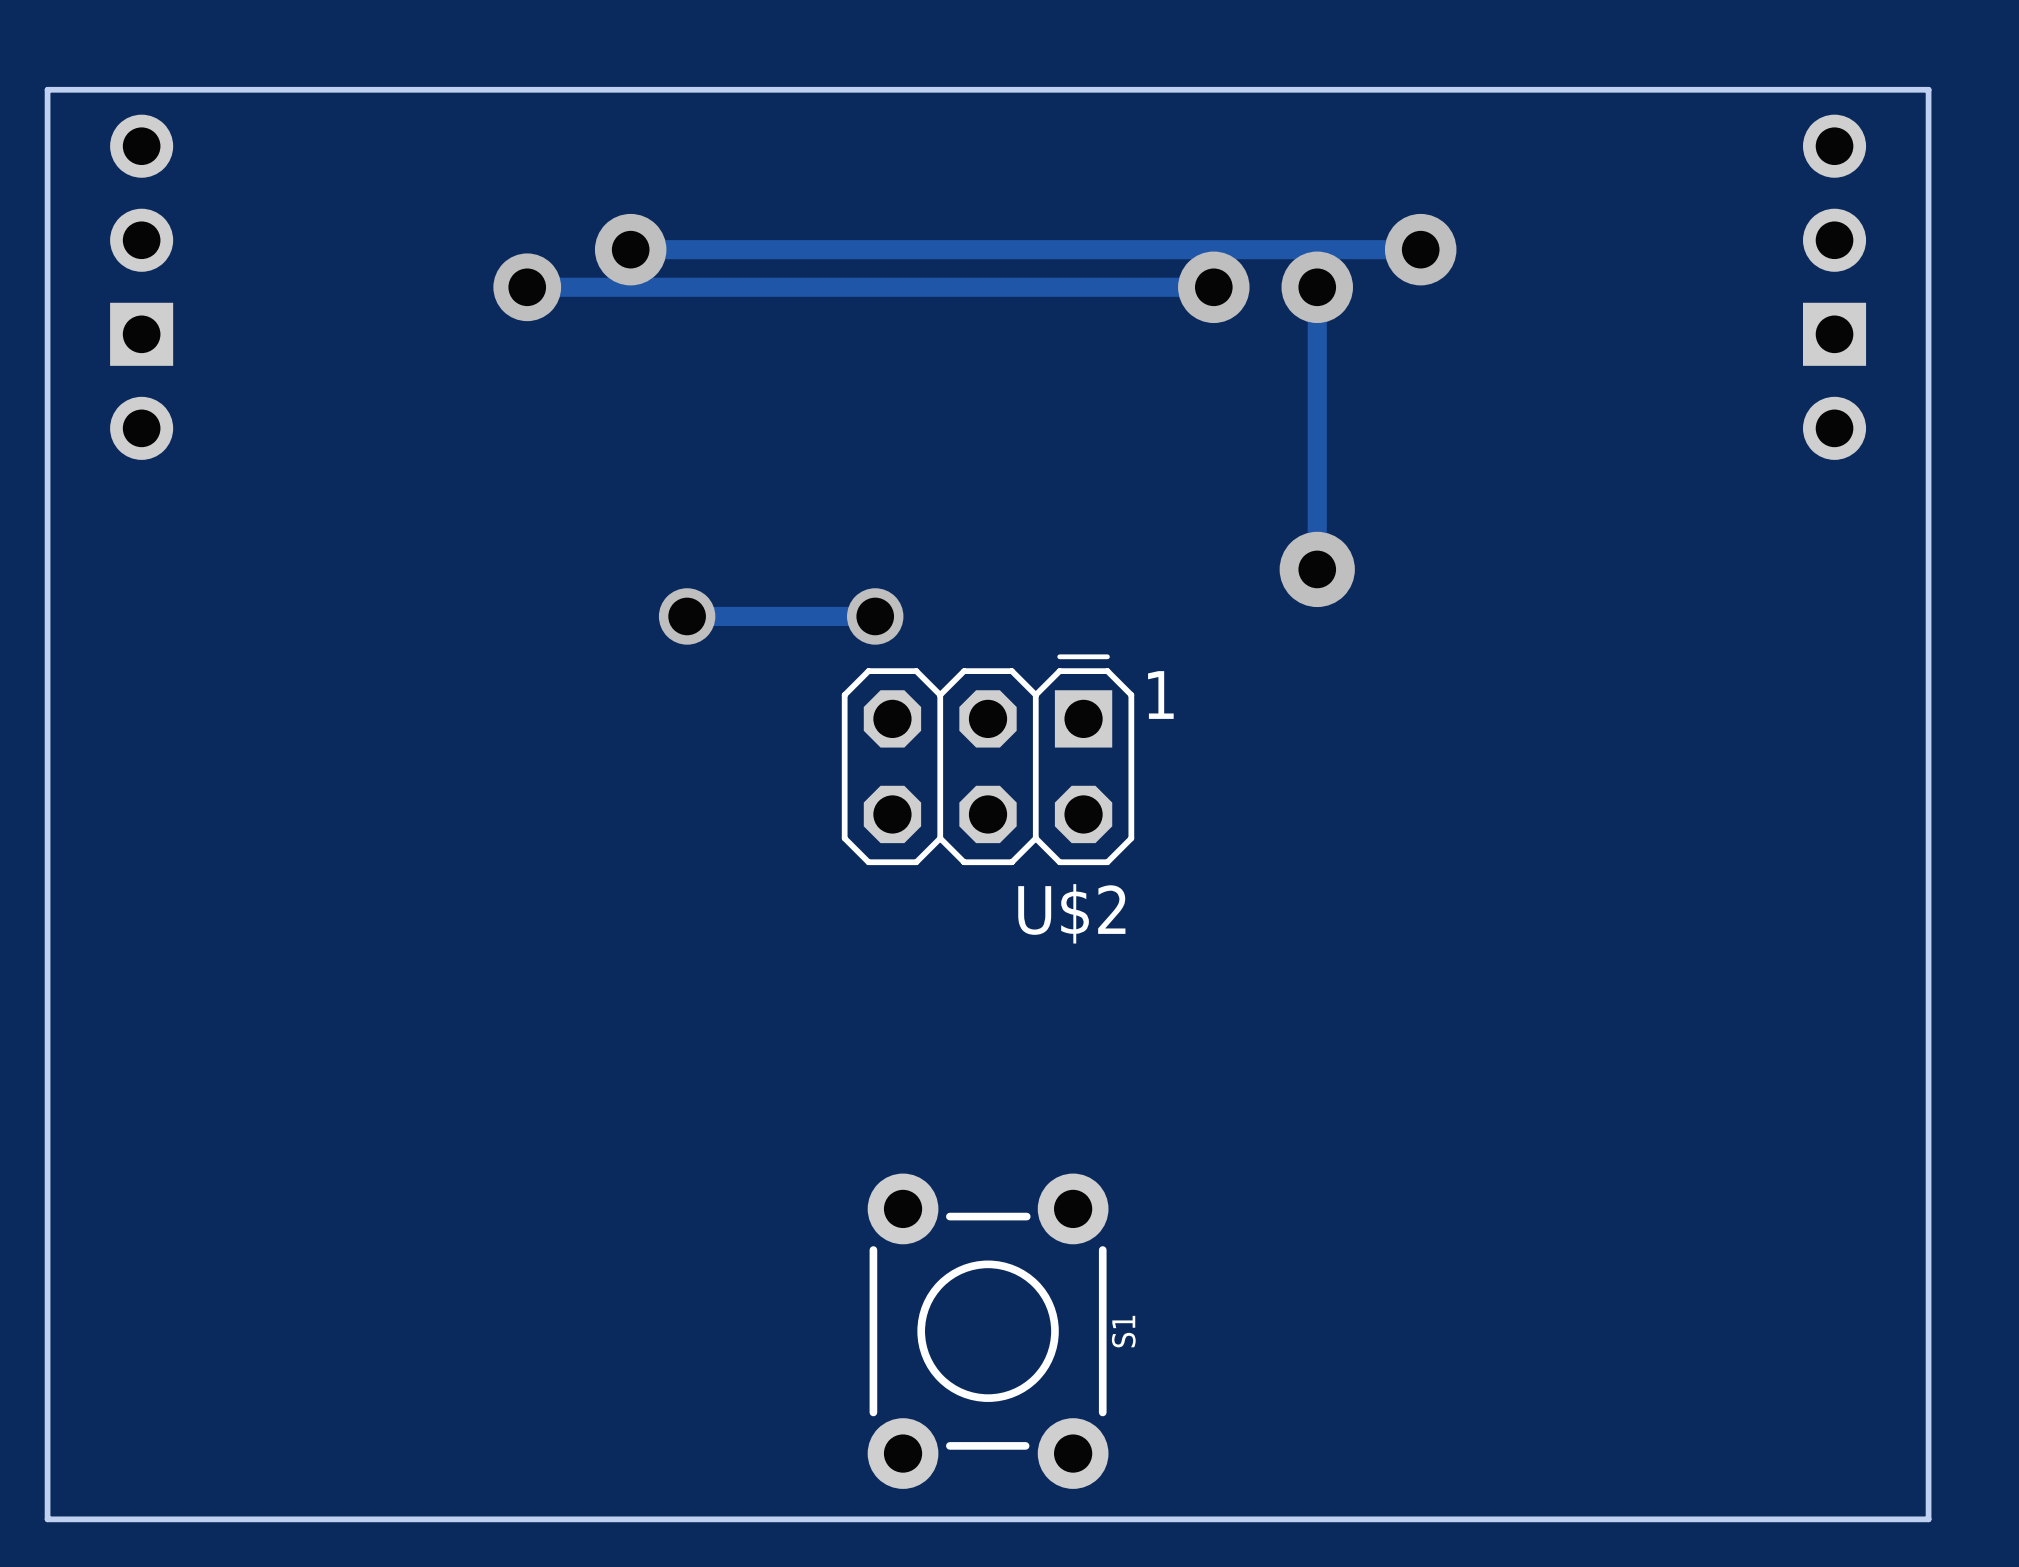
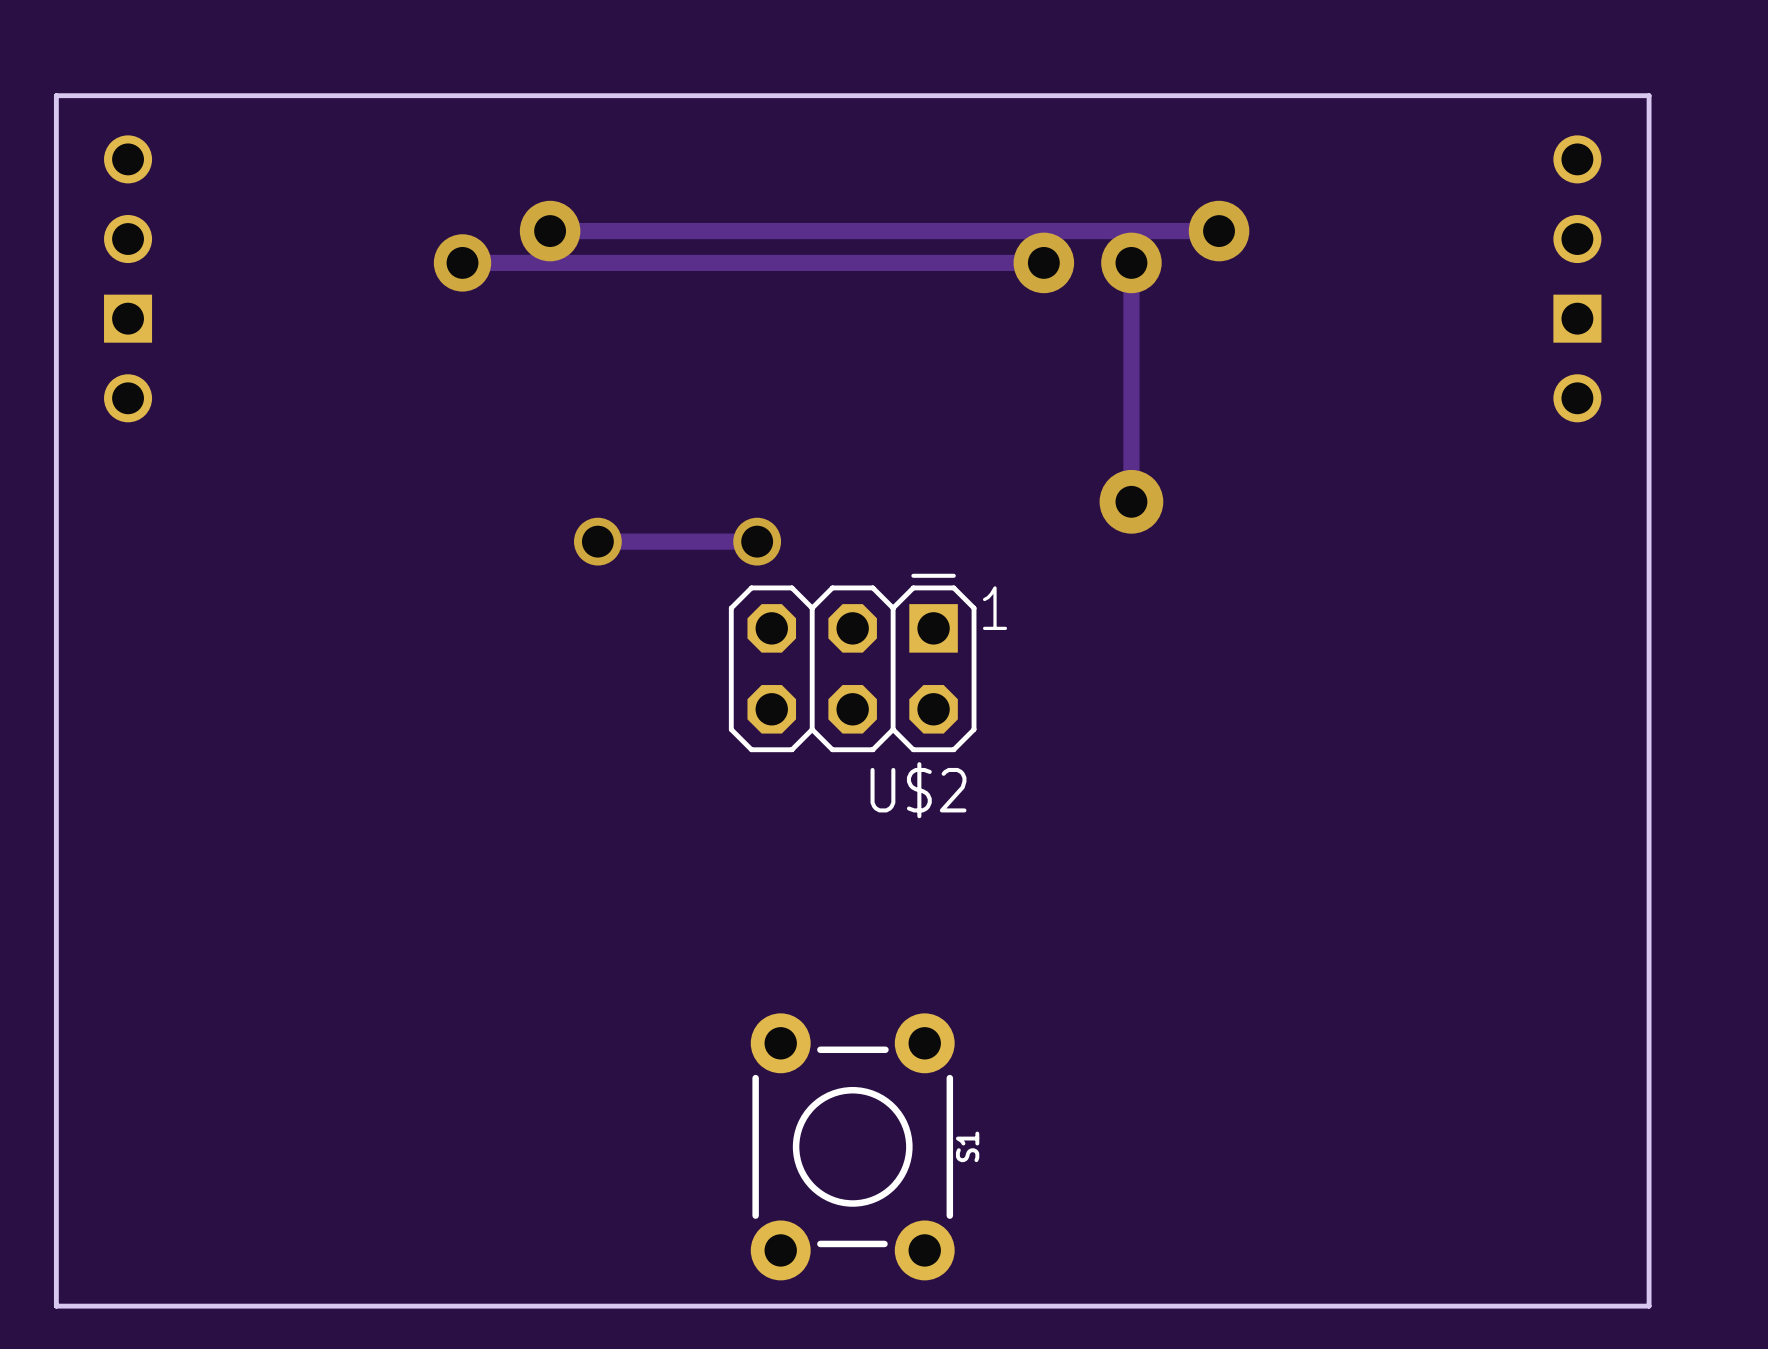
part footprint: [110, 114, 174, 460] -> [104, 135, 153, 423]
part footprint: [1802, 114, 1867, 460] -> [1553, 135, 1602, 423]

